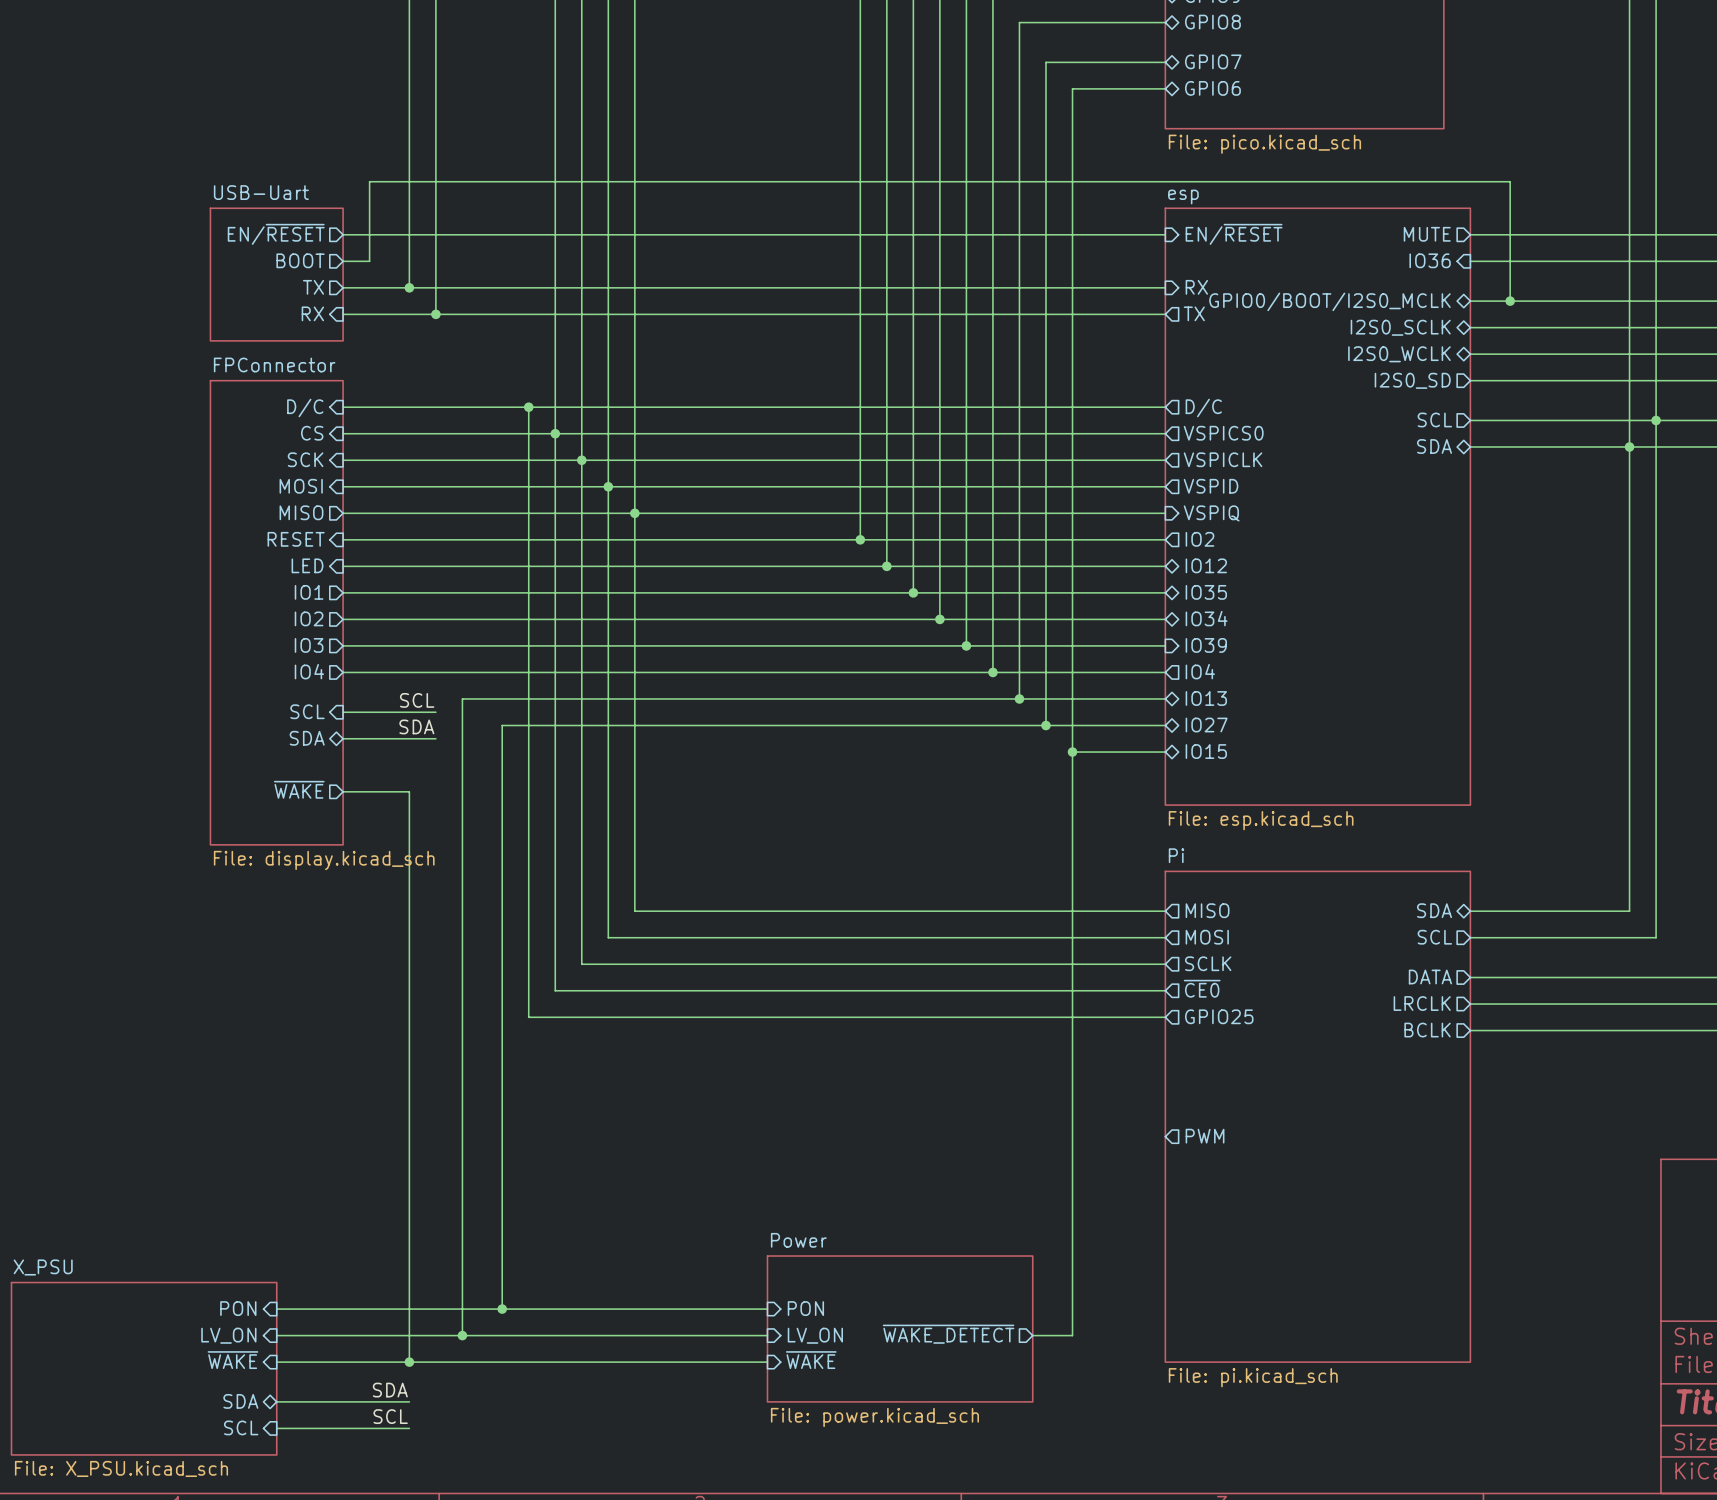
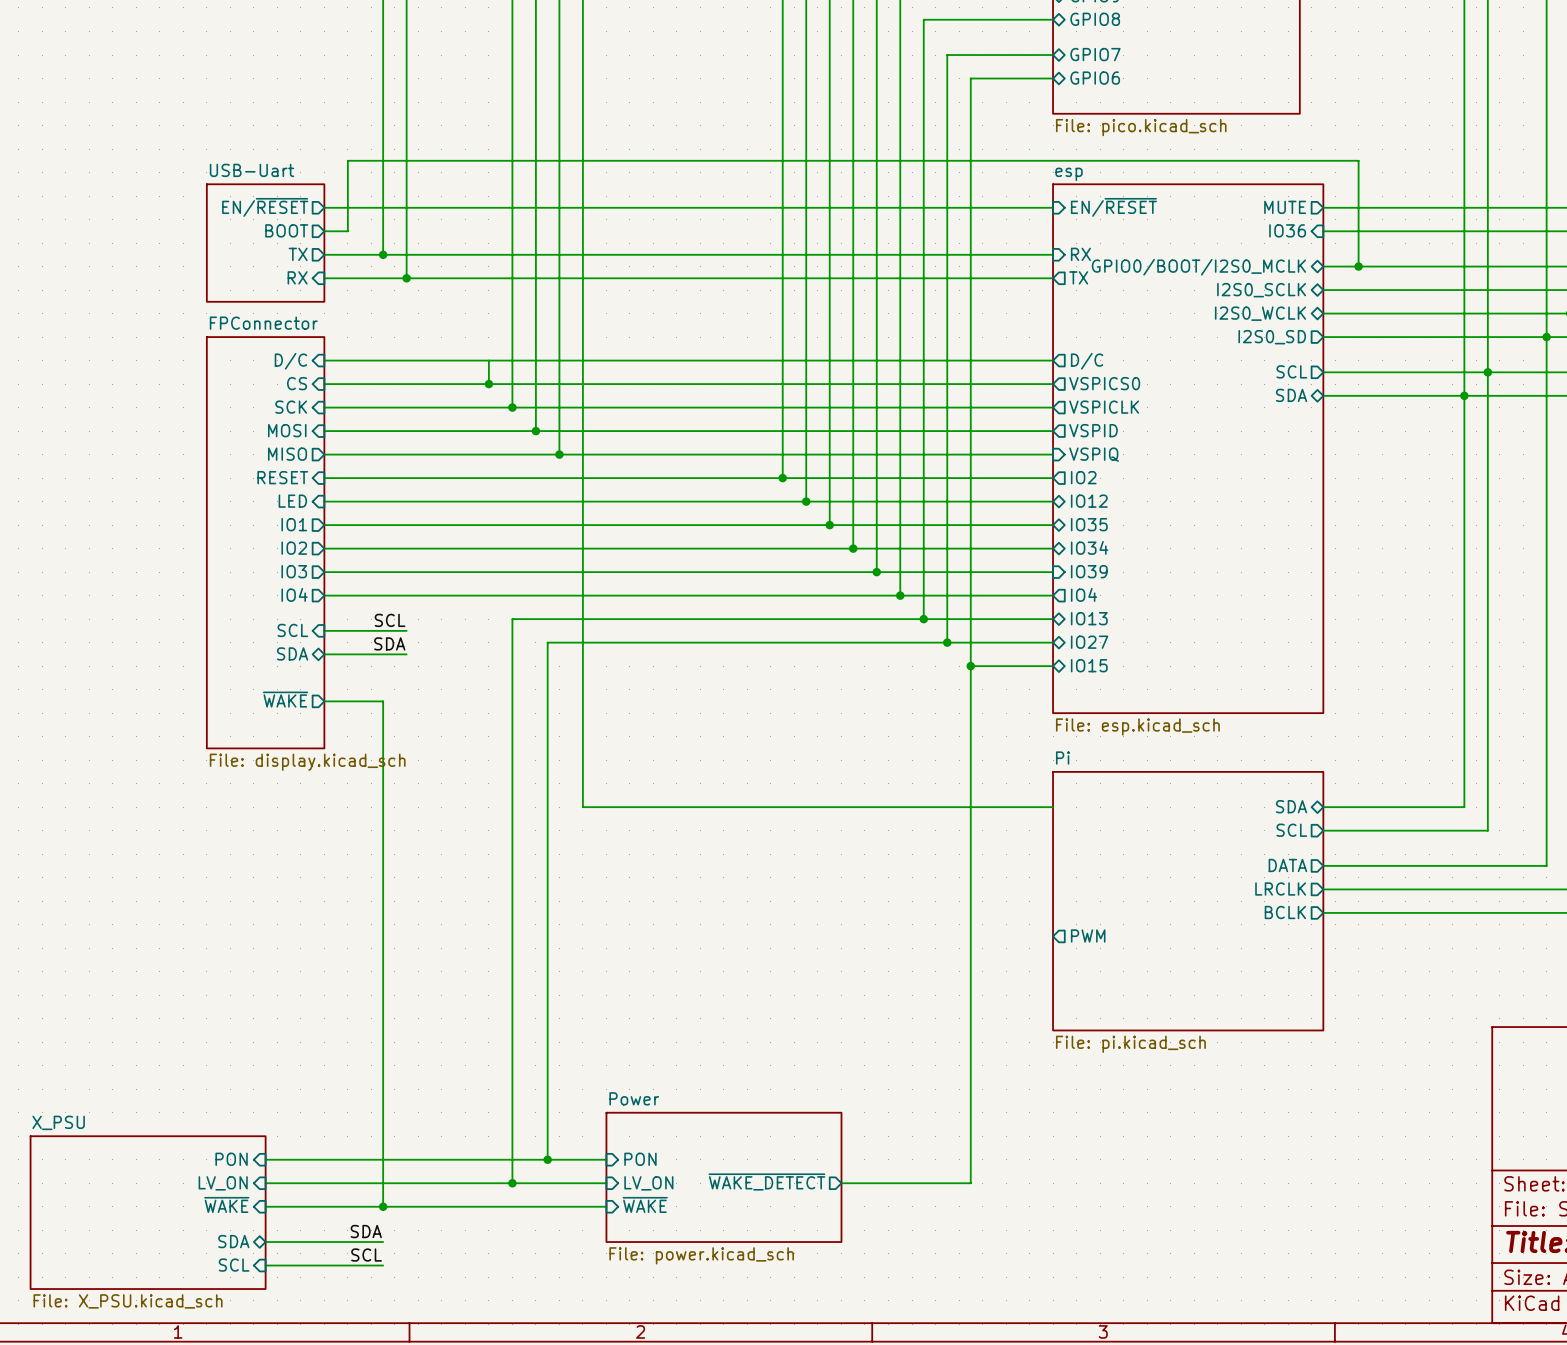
junction: (528, 407) -> none
wire: (528, 433) (528, 1017) (1165, 1017) -> none
junction: none -> (488, 384)
junction: (555, 433) -> none
wire: (555, 460) (555, 698) (462, 698) (462, 1335) -> none
junction: none -> (512, 407)
junction: (581, 460) -> none
wire: (581, 486) (581, 964) (1165, 964) -> none
junction: none -> (535, 431)
junction: (608, 486) -> none
wire: (608, 513) (608, 937) (1165, 937) -> none
junction: none -> (559, 454)
junction: (634, 513) -> none
wire: (595, 725) (502, 725) (502, 1309) -> (547, 642) (547, 1159)
sheet pin: MISO (1207, 910) -> none
sheet pin: MOSI (1207, 937) -> none
sheet pin: SCLK (1208, 963) -> none
sheet pin: ~{CE0} (1202, 988) -> none
wire: (555, 990) (1165, 990) -> (512, 877) (512, 1183)
sheet pin: GPIO25 (1219, 1016) -> none
sheet Pi: none -> File: pi.kicad_sch (1188, 901)
sheet Pi: File: pi.kicad_sch (1317, 1116) -> none
sheet pin position: PWM (1205, 1136) -> PWM (1088, 936)
sheet pin position: PON (805, 1308) -> PON (640, 1159)
junction: (502, 1309) -> none
junction: none -> (547, 1159)
wire: (661, 1309) (767, 1309) -> none
sheet Power position: (900, 1328) -> (723, 1177)
sheet pin position: ~{WAKE_DETECT} (948, 1334) -> ~{WAKE_DETECT} (766, 1182)
junction: (462, 1335) -> none
junction: none -> (512, 1183)
wire: (661, 1335) (767, 1335) -> none
sheet pin position: LV_ON (815, 1335) -> LV_ON (648, 1183)
wire: none -> (841, 1183) (935, 1183)
sheet pin position: ~{WAKE} (811, 1360) -> ~{WAKE} (645, 1204)
wire: (661, 1362) (767, 1362) -> none

